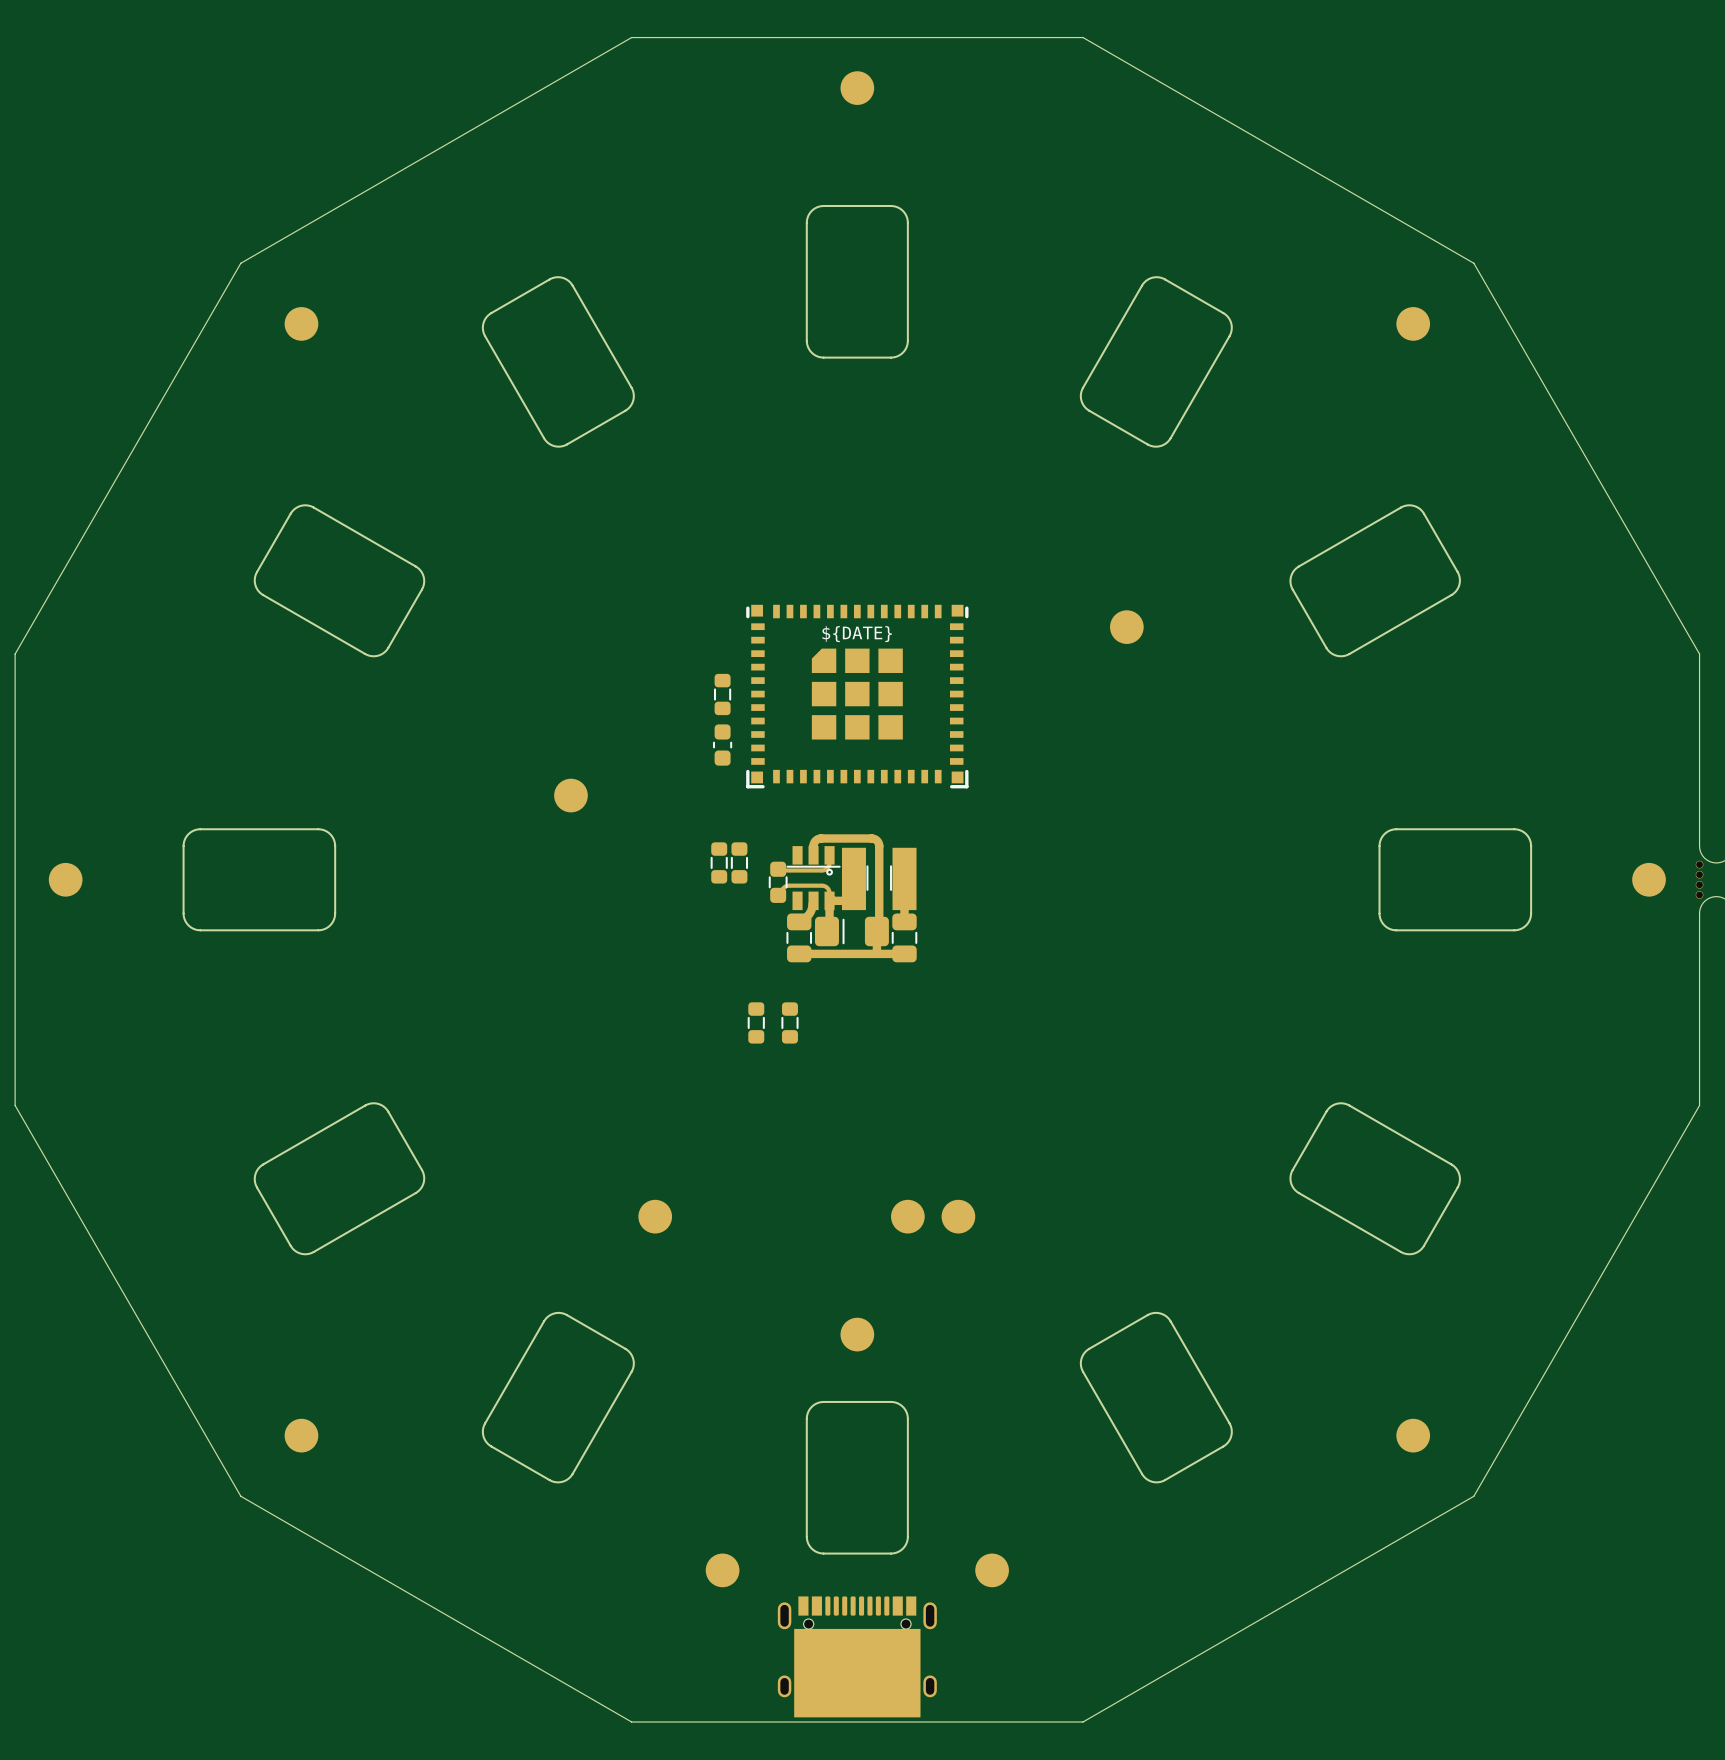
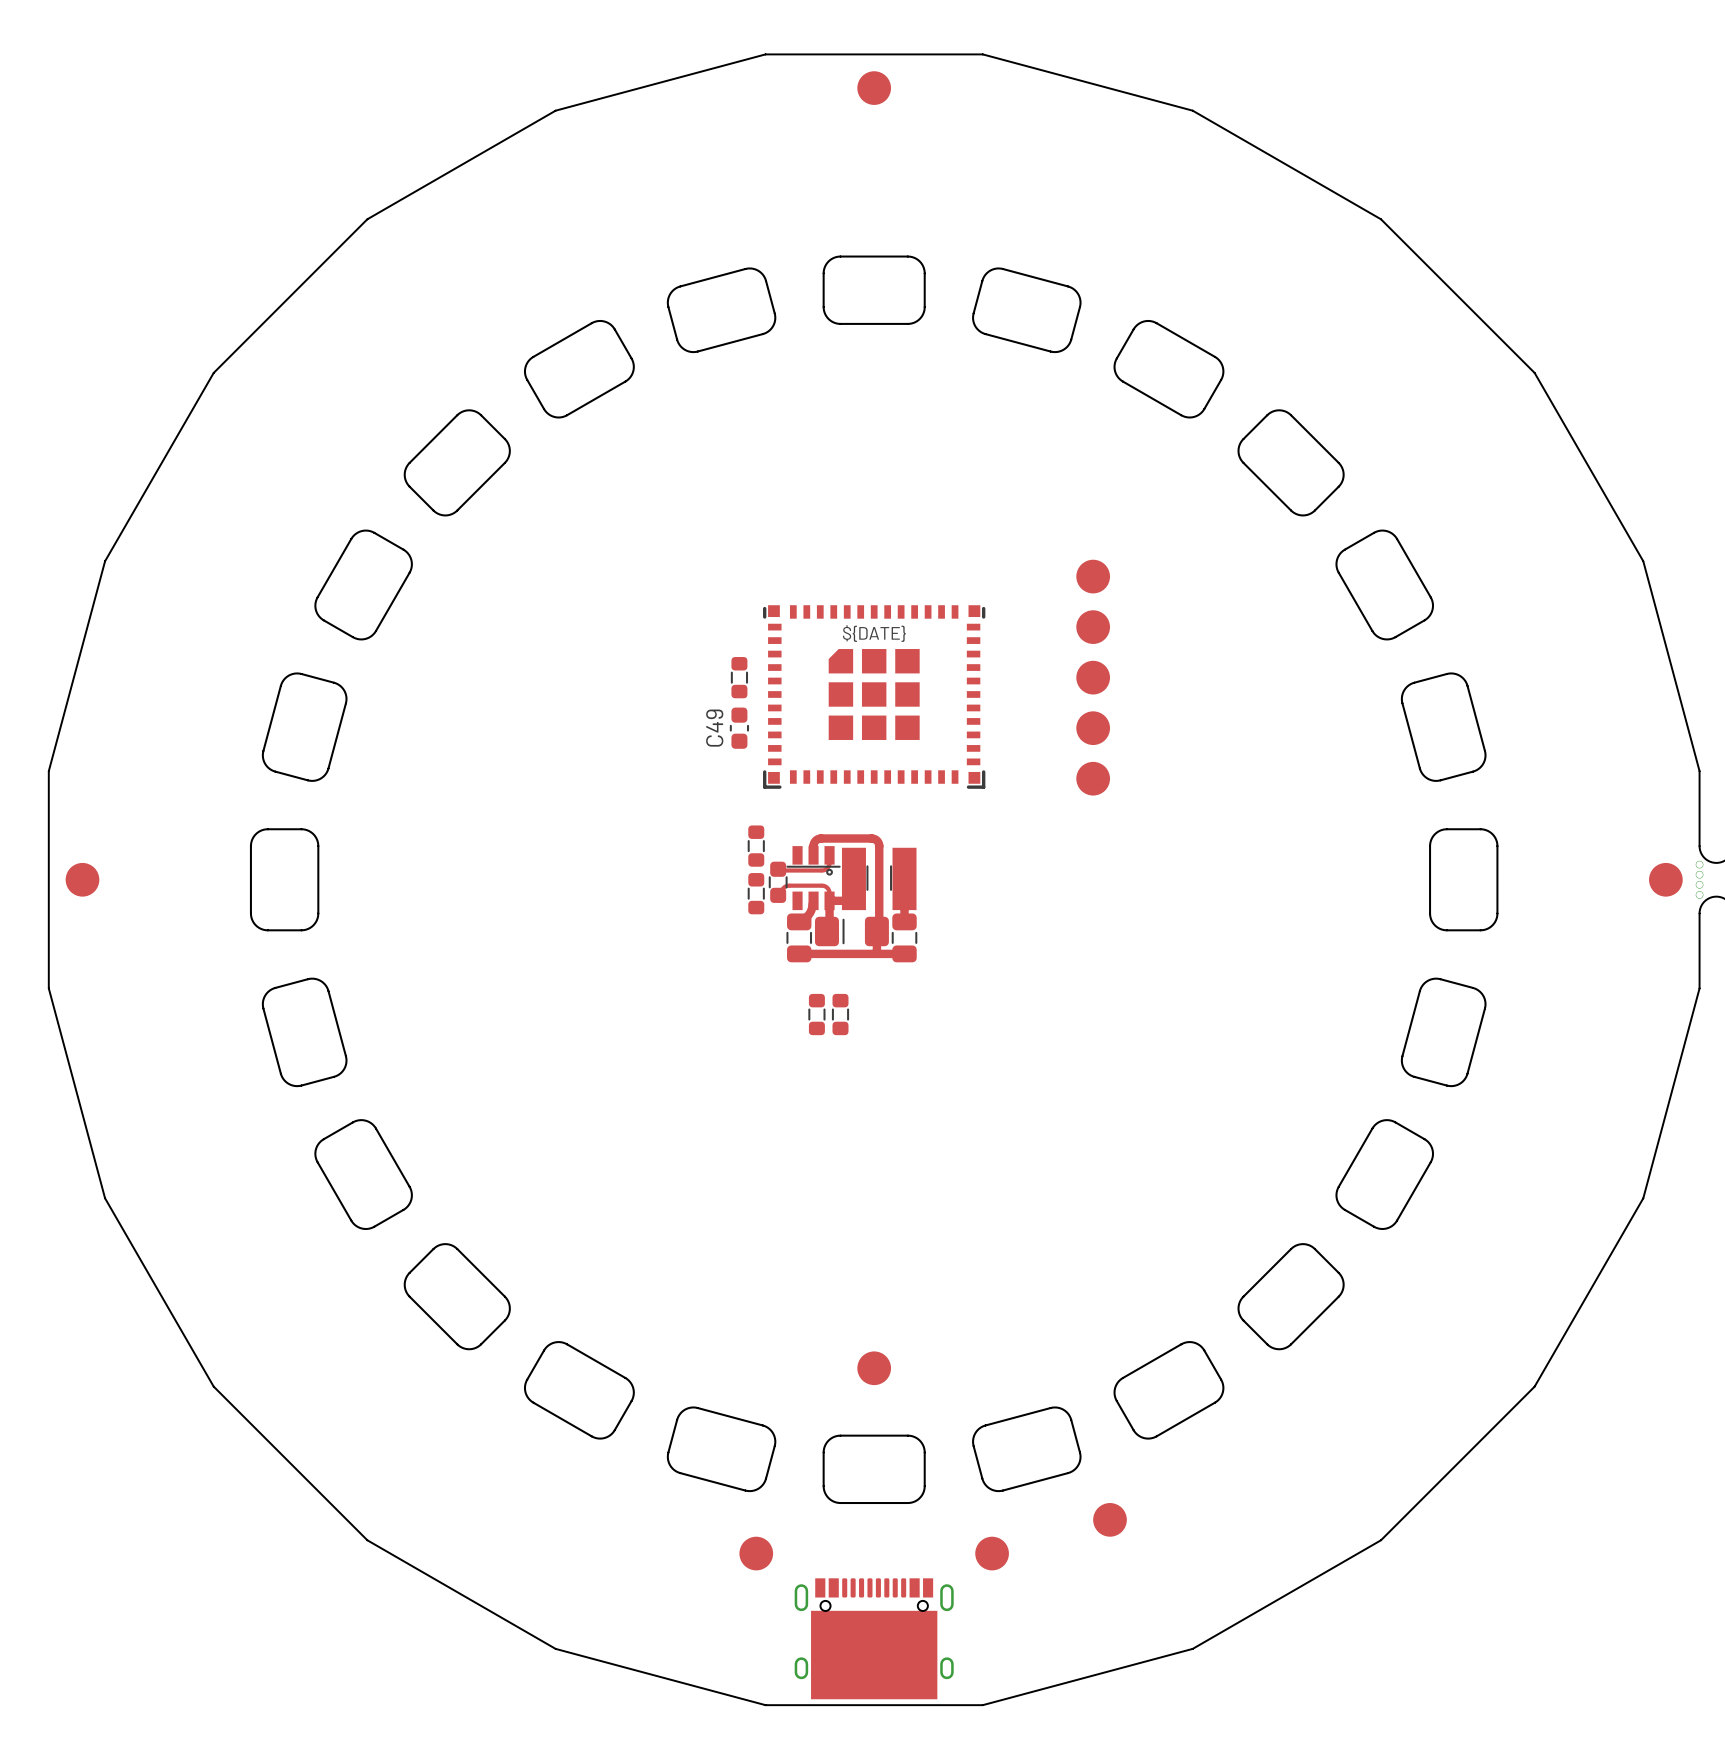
part position: (857, 88) -> (874, 88)
drawing: [805, 204, 909, 359] -> none
drawing: none -> [822, 255, 926, 325]
drawing: none -> [666, 267, 777, 354]
drawing: none -> [972, 267, 1082, 354]
drawing: [481, 276, 635, 448] -> none
drawing shape: [1079, 276, 1233, 448] -> [1113, 319, 1225, 419]
drawing: none -> [314, 319, 635, 641]
part: (301, 323) -> none
part: (1413, 323) -> none
drawing: none -> [1237, 409, 1345, 517]
drawing: [253, 504, 426, 658] -> none
drawing shape: [1289, 504, 1461, 658] -> [1335, 529, 1435, 641]
part: none -> (1093, 576)
part: none -> (1093, 627)
part: (1126, 627) -> none
drawing: none -> [261, 672, 348, 782]
drawing: none -> [1400, 672, 1487, 782]
part: none -> (1093, 677)
part position: (722, 694) -> (739, 677)
part position: (857, 696) -> (874, 697)
C49: none -> (739, 728)
part: none -> (1093, 728)
part: (722, 745) -> none
board edge: (1699, 771) (1699, 654) (1473, 263) (1083, 37) (631, 37) (240, 263) (15, 654) (15, 1105) (240, 1496) (631, 1722) (1083, 1722) (1473, 1496) (1699, 1105) (1699, 988) -> (1699, 771) (1643, 561) (1534, 372) (1381, 219) (1192, 110) (982, 54) (765, 54) (555, 110) (367, 219) (213, 372) (105, 561) (48, 771) (48, 988) (105, 1198) (213, 1386) (367, 1540) (555, 1648) (765, 1705) (982, 1705) (1192, 1648) (1381, 1540) (1534, 1386) (1643, 1198) (1699, 988)
part: none -> (1093, 778)
part: (570, 795) -> none
drawing: [182, 828, 337, 932] -> none
drawing: none -> [249, 828, 320, 932]
drawing shape: [1378, 828, 1533, 932] -> [1429, 828, 1499, 932]
part: none -> (756, 846)
part: (719, 862) -> none
part: (739, 862) -> none
part position: (65, 879) -> (82, 879)
part position: (1649, 879) -> (1665, 879)
part: none -> (756, 893)
drawing: none -> [261, 977, 348, 1088]
drawing: none -> [1400, 977, 1487, 1088]
part: none -> (816, 1014)
part: none -> (840, 1014)
part: (756, 1022) -> none
part: (789, 1022) -> none
drawing: [253, 1102, 426, 1256] -> none
drawing shape: [1289, 1102, 1461, 1256] -> [1335, 1119, 1435, 1230]
drawing: none -> [314, 1119, 635, 1440]
part: (655, 1216) -> none
part: (907, 1216) -> none
part: (958, 1216) -> none
drawing: none -> [1237, 1243, 1345, 1351]
drawing: [481, 1311, 635, 1484] -> none
drawing shape: [1079, 1311, 1233, 1484] -> [1113, 1341, 1225, 1440]
part position: (857, 1334) -> (874, 1368)
drawing: [805, 1400, 909, 1555] -> none
drawing: none -> [666, 1406, 777, 1493]
drawing: none -> [972, 1406, 1082, 1493]
drawing: none -> [822, 1434, 926, 1505]
part: (301, 1435) -> none
part: (1413, 1435) -> none
part: none -> (1110, 1519)
part position: (722, 1570) -> (756, 1553)
part position: (992, 1570) -> (992, 1553)
part position: (857, 1656) -> (874, 1638)

